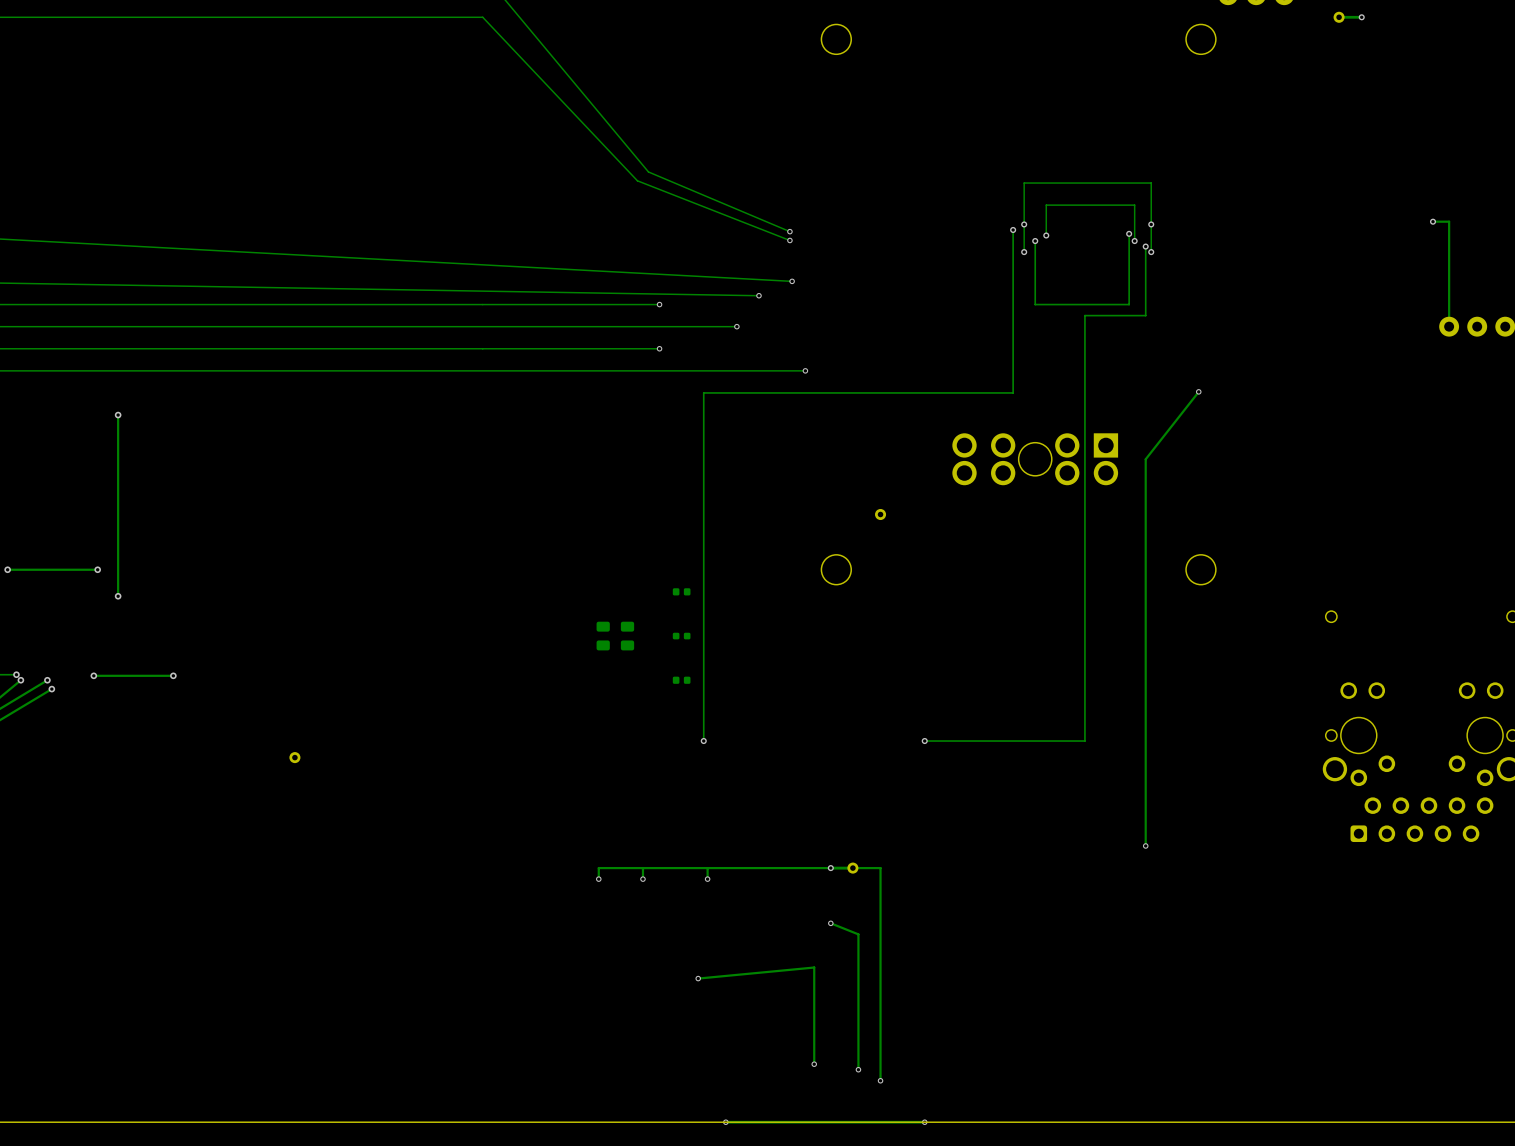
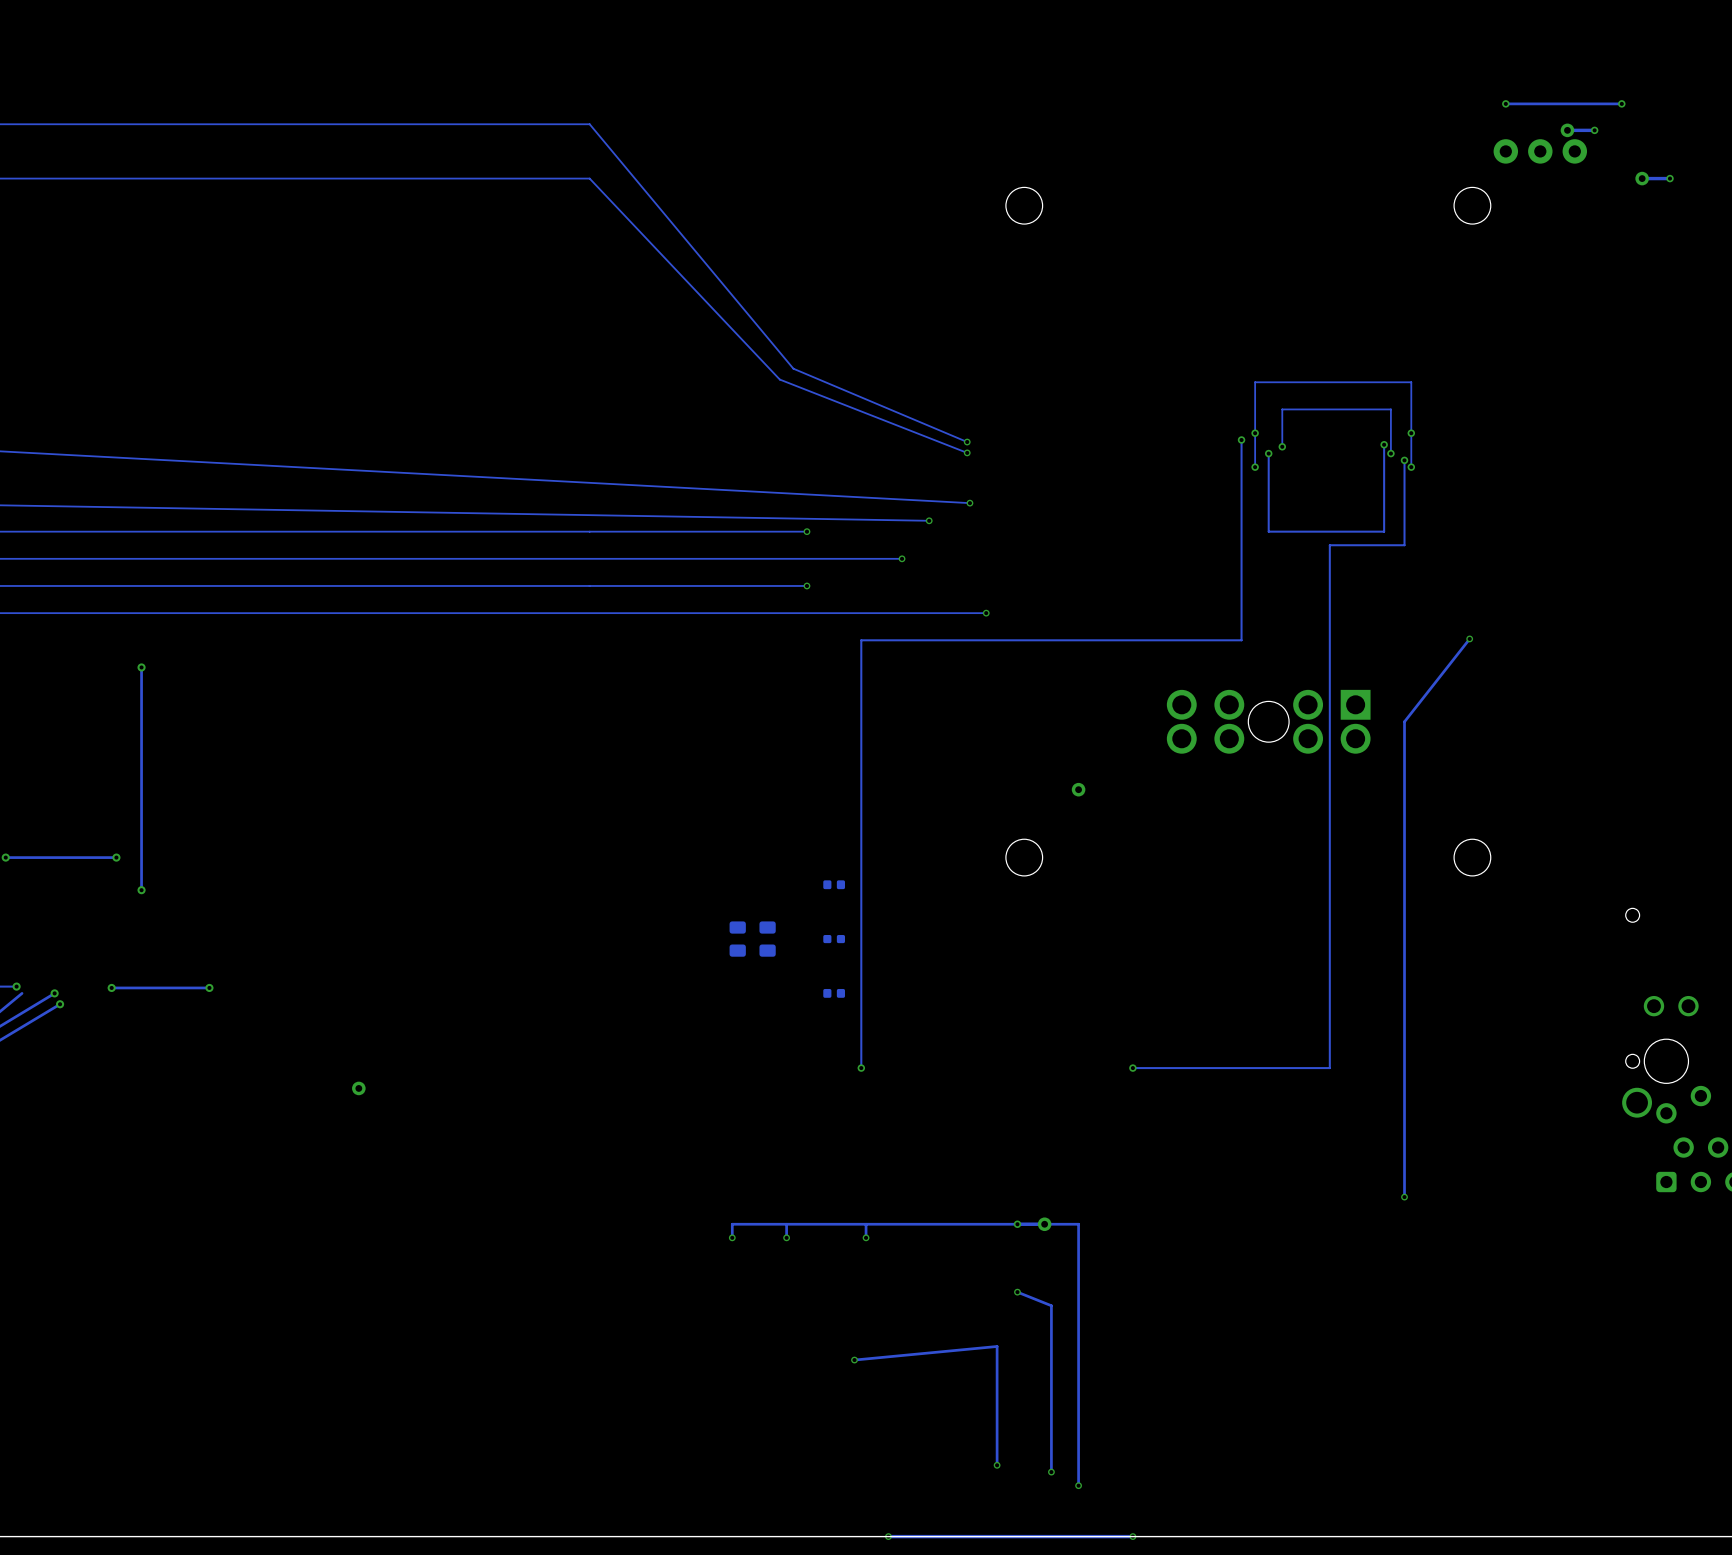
via: (20, 680) -> none

